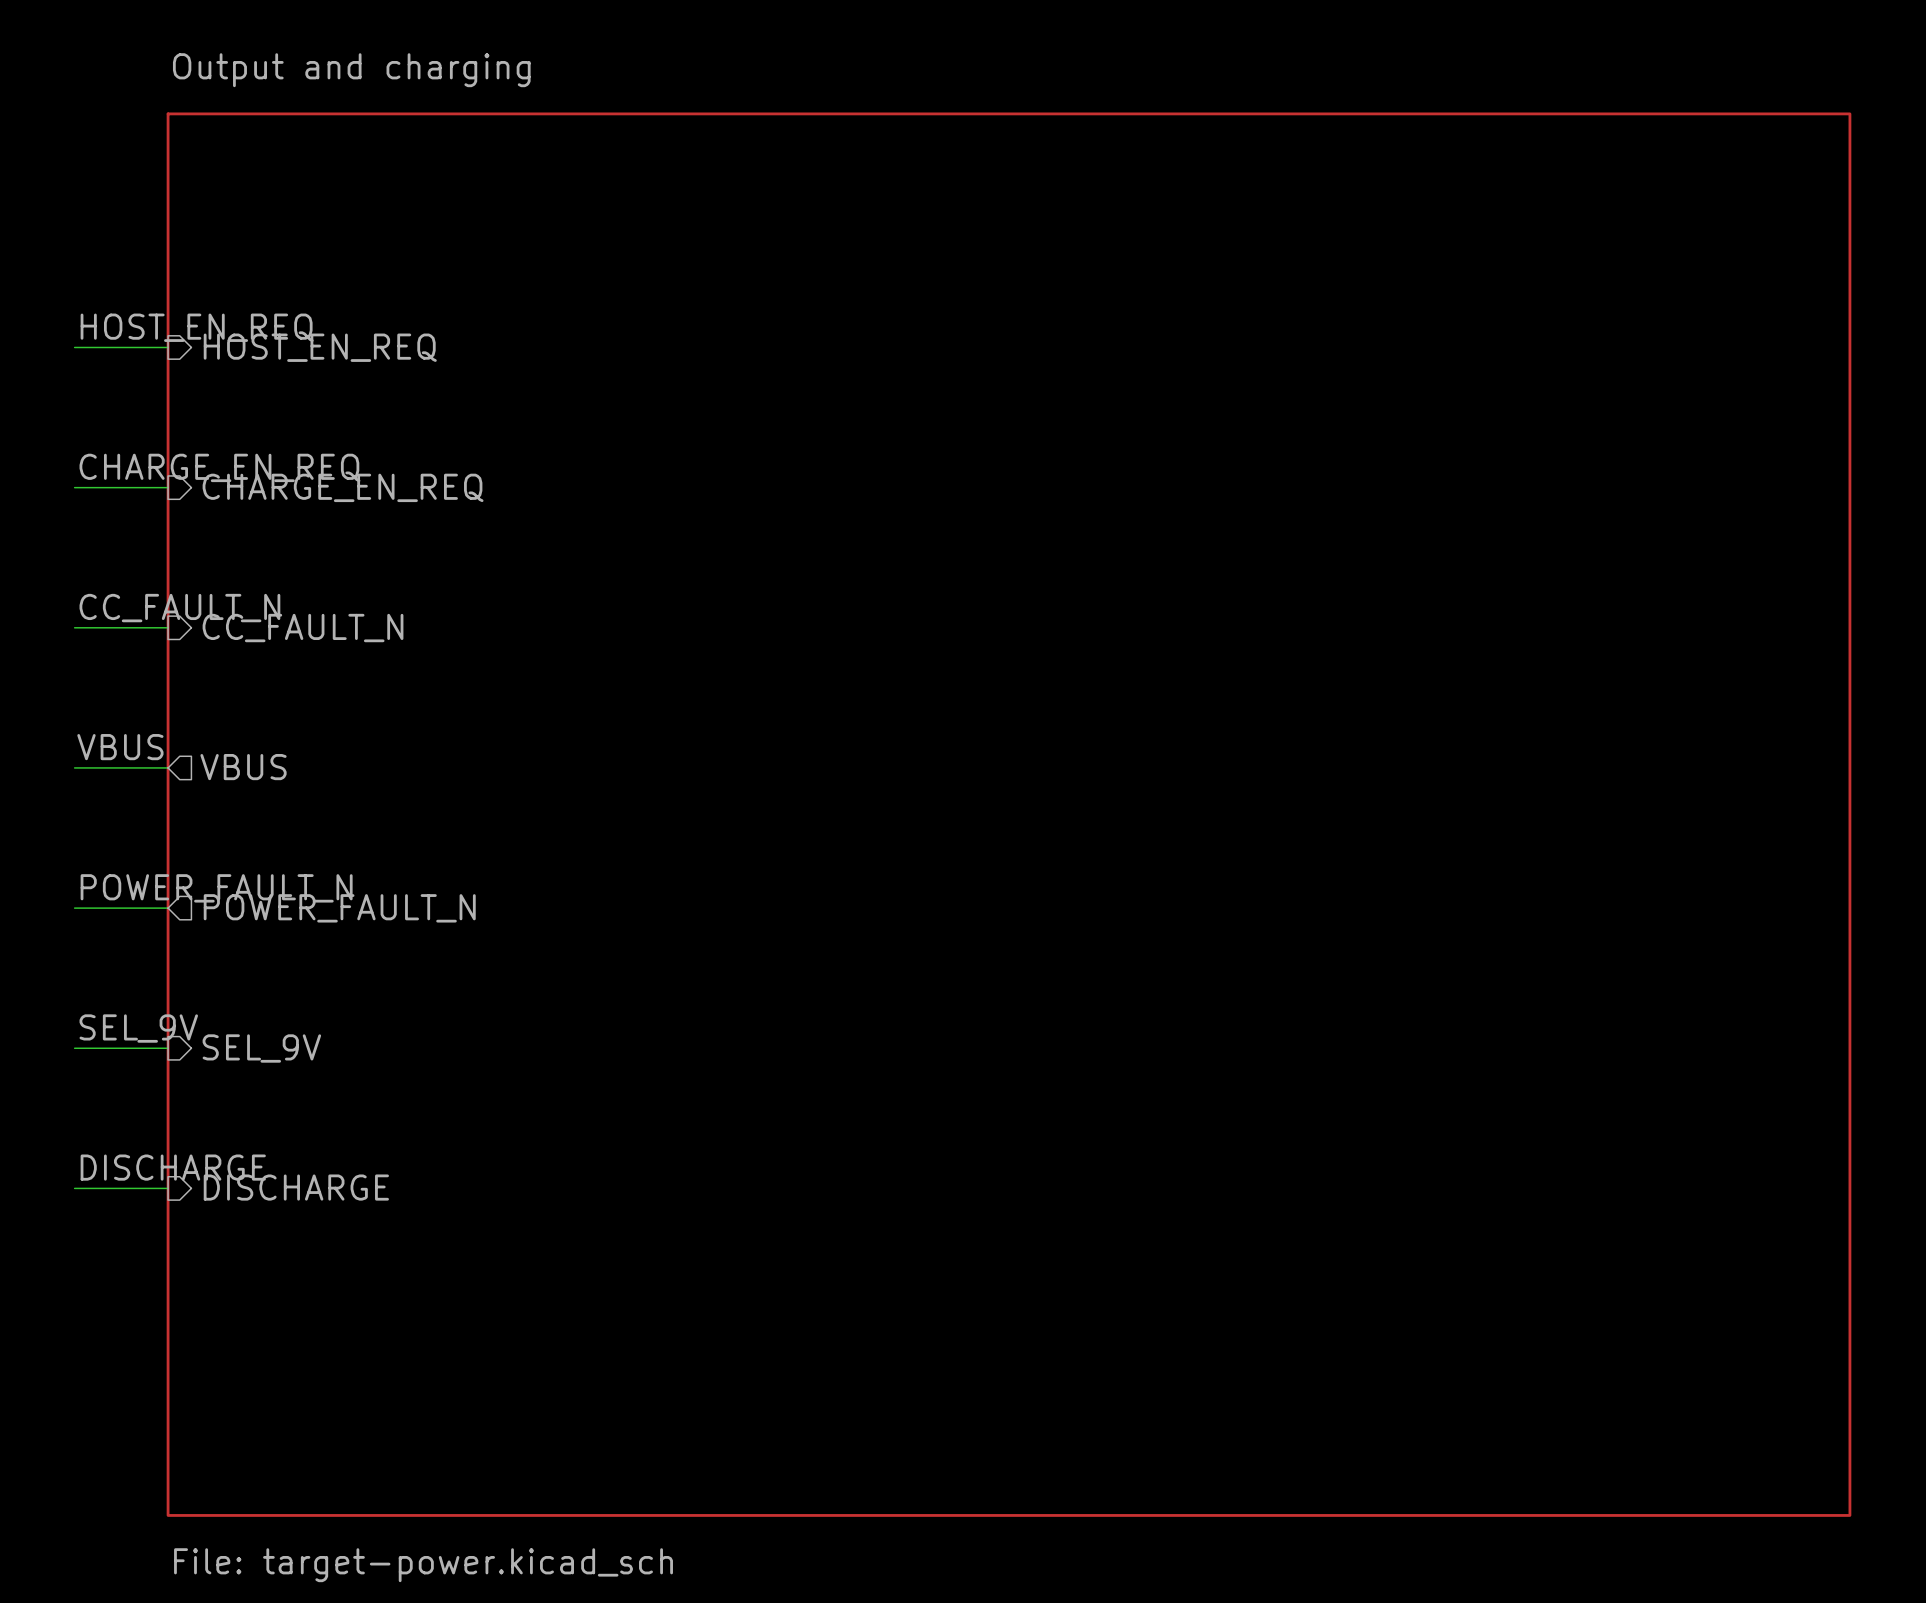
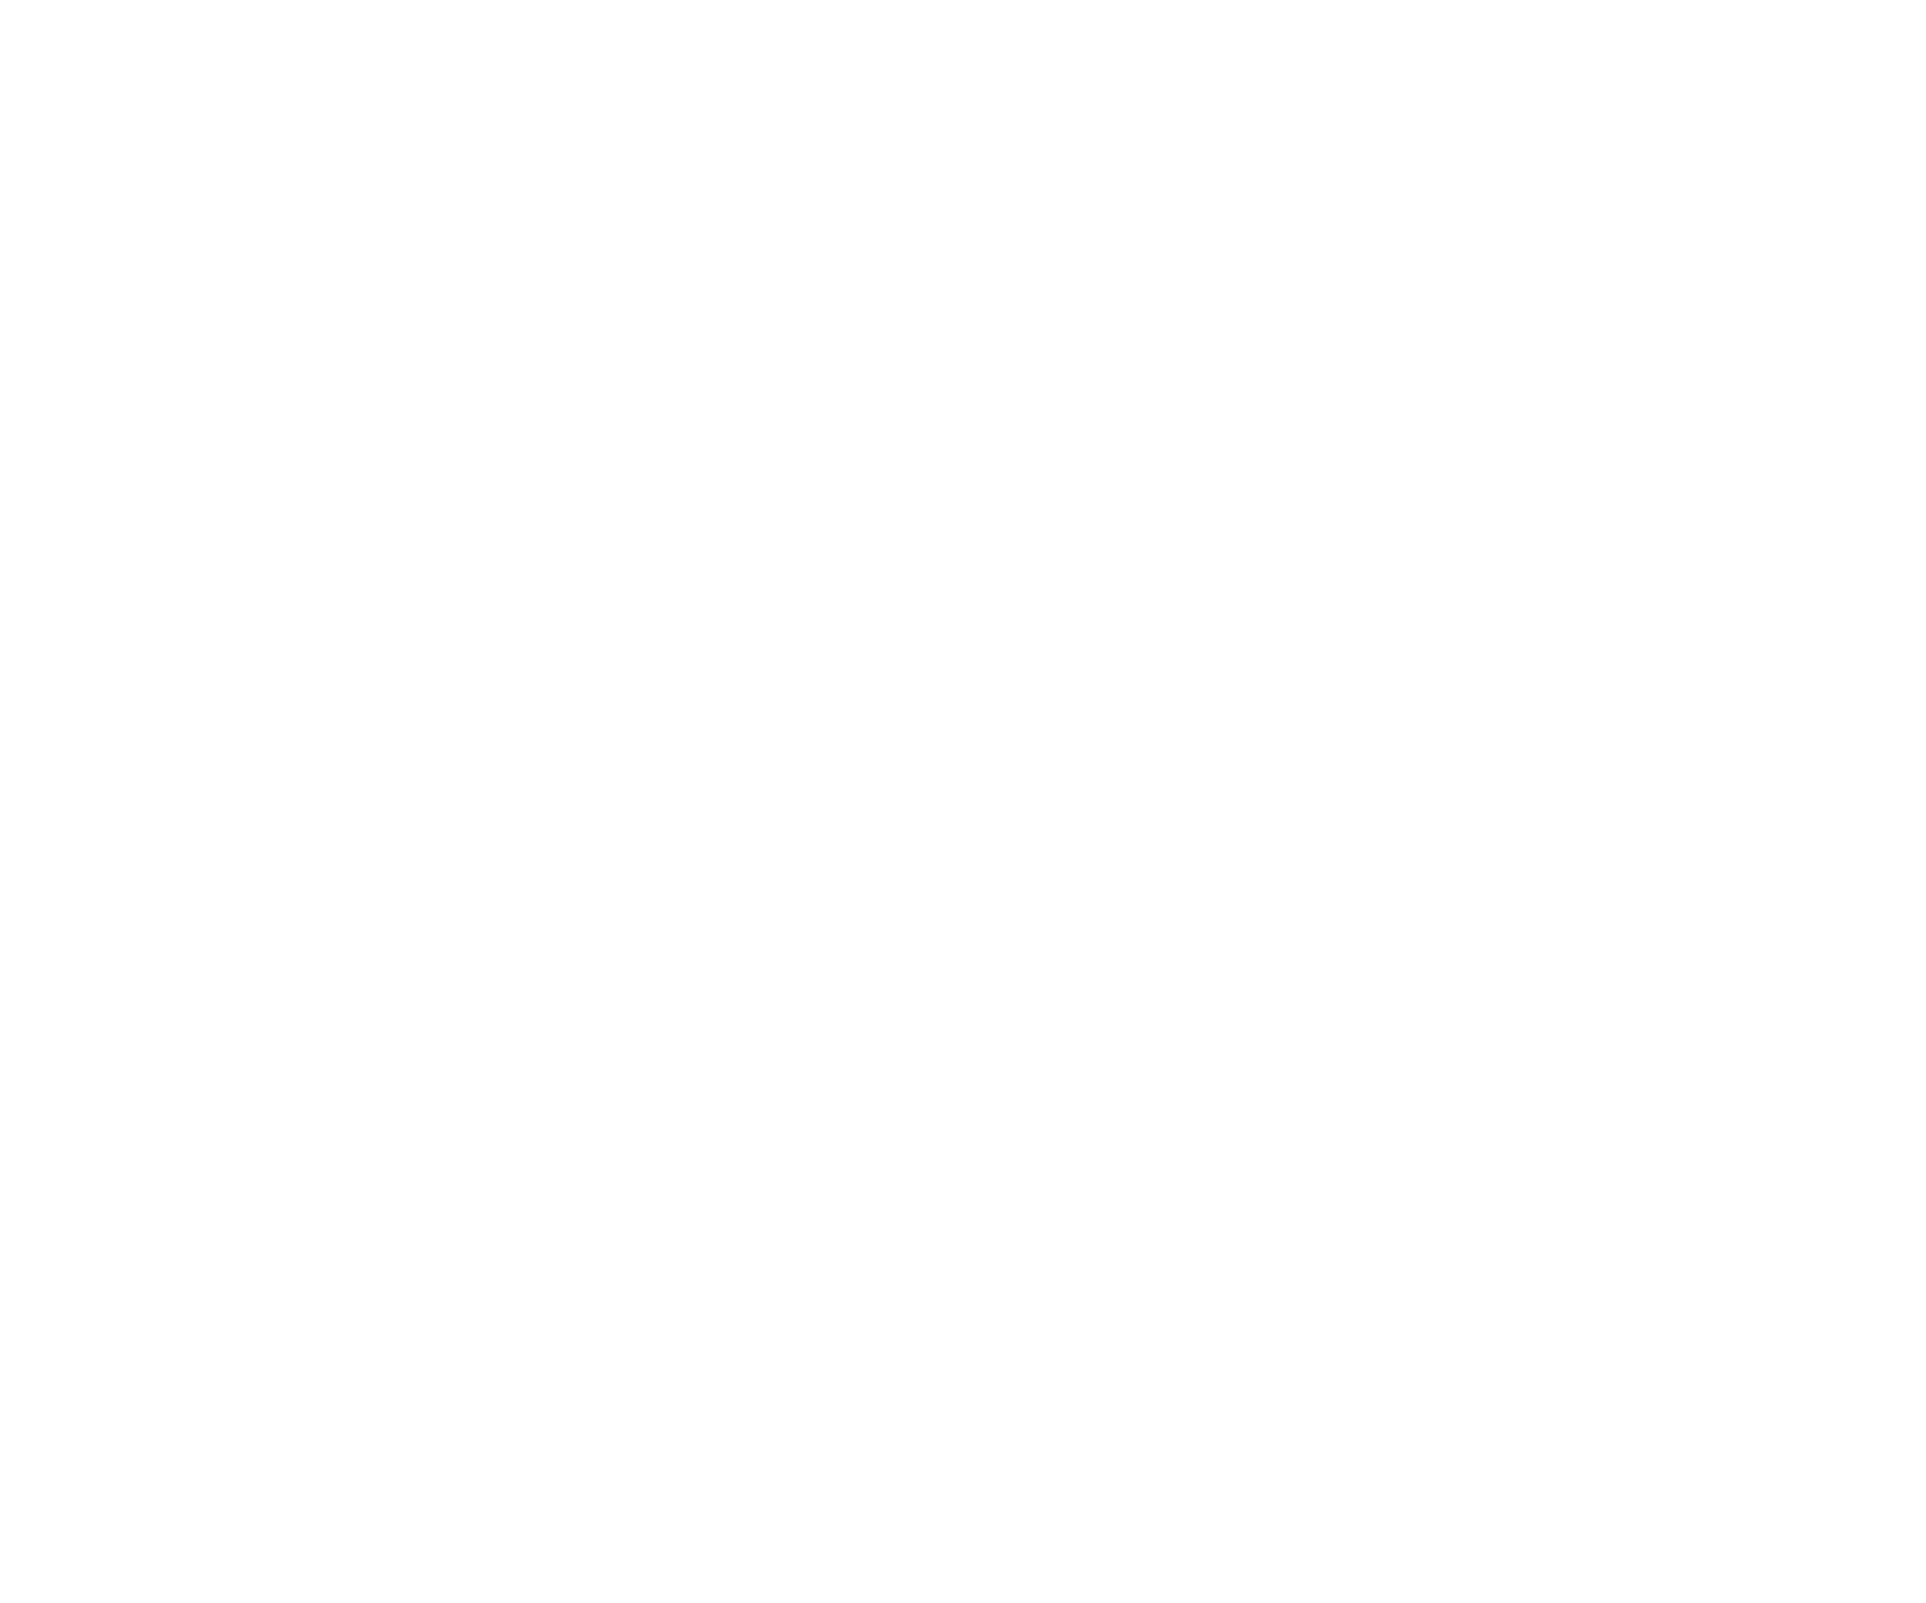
label: HOST_EN_REQ (197, 327) -> none
wire: (74, 347) (168, 347) -> none
sheet pin: HOST_EN_REQ (320, 347) -> none
label: CHARGE_EN_REQ (219, 467) -> none
wire: (74, 487) (168, 487) -> none
sheet pin: CHARGE_EN_REQ (343, 487) -> none
label: CC_FAULT_N (179, 608) -> none
wire: (74, 627) (168, 627) -> none
sheet pin: CC_FAULT_N (303, 628) -> none
label: VBUS (120, 747) -> none
wire: (74, 767) (168, 767) -> none
sheet pin: VBUS (243, 767) -> none
sheet Output and charging: File: target-power.kicad_sch (1008, 814) -> none
label: POWER_FAULT_N (216, 888) -> none
wire: (74, 908) (168, 908) -> none
sheet pin: POWER_FAULT_N (339, 908) -> none
label: SEL_9V (138, 1028) -> none
wire: (74, 1048) (168, 1048) -> none
sheet pin: SEL_9V (261, 1048) -> none
label: DISCHARGE (173, 1167) -> none
sheet pin: DISCHARGE (296, 1187) -> none
wire: (74, 1188) (168, 1188) -> none

